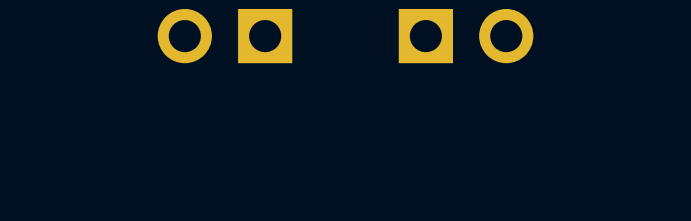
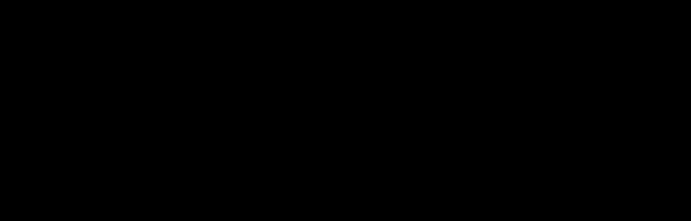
part: (224, 36) -> none
part: (466, 36) -> none

